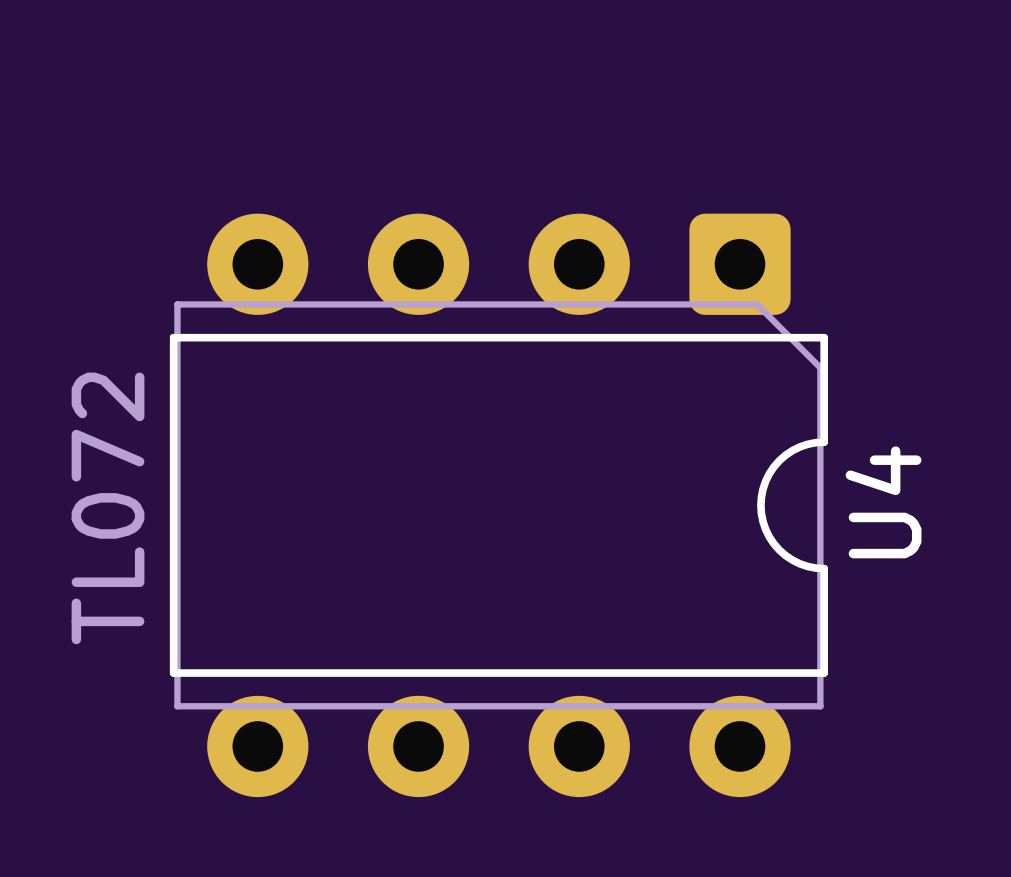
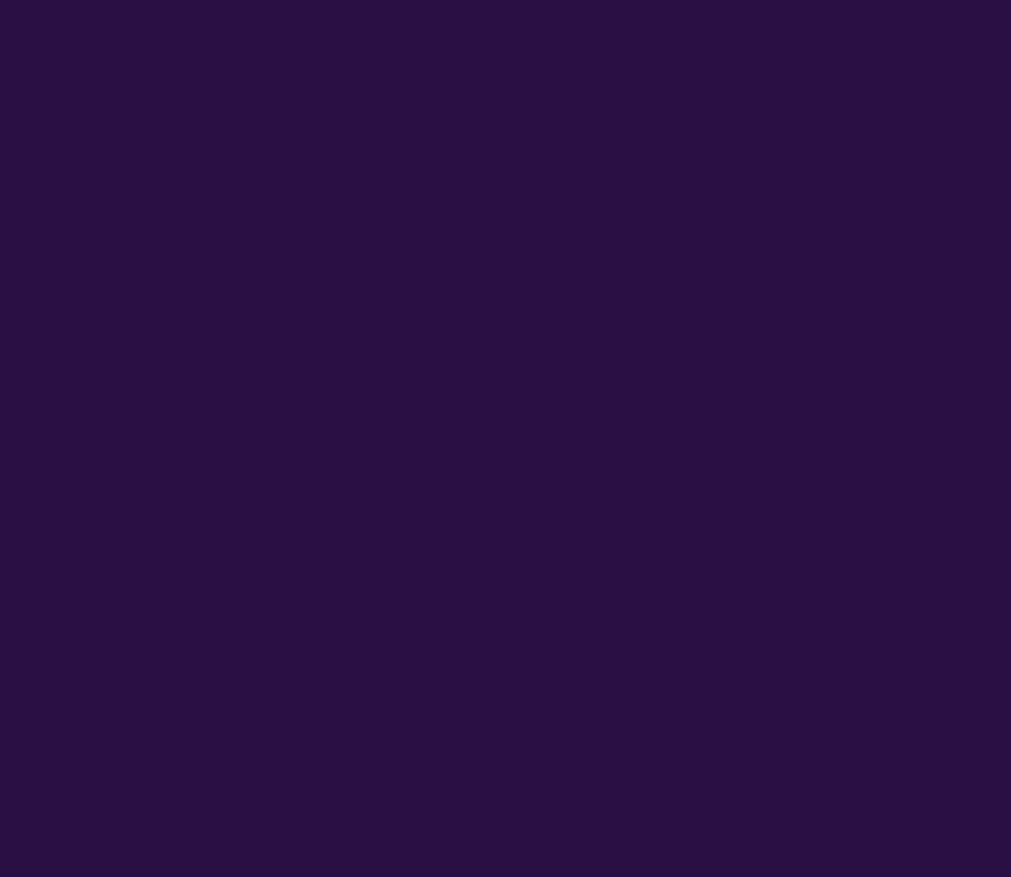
U4: TL072 (498, 505) -> none

